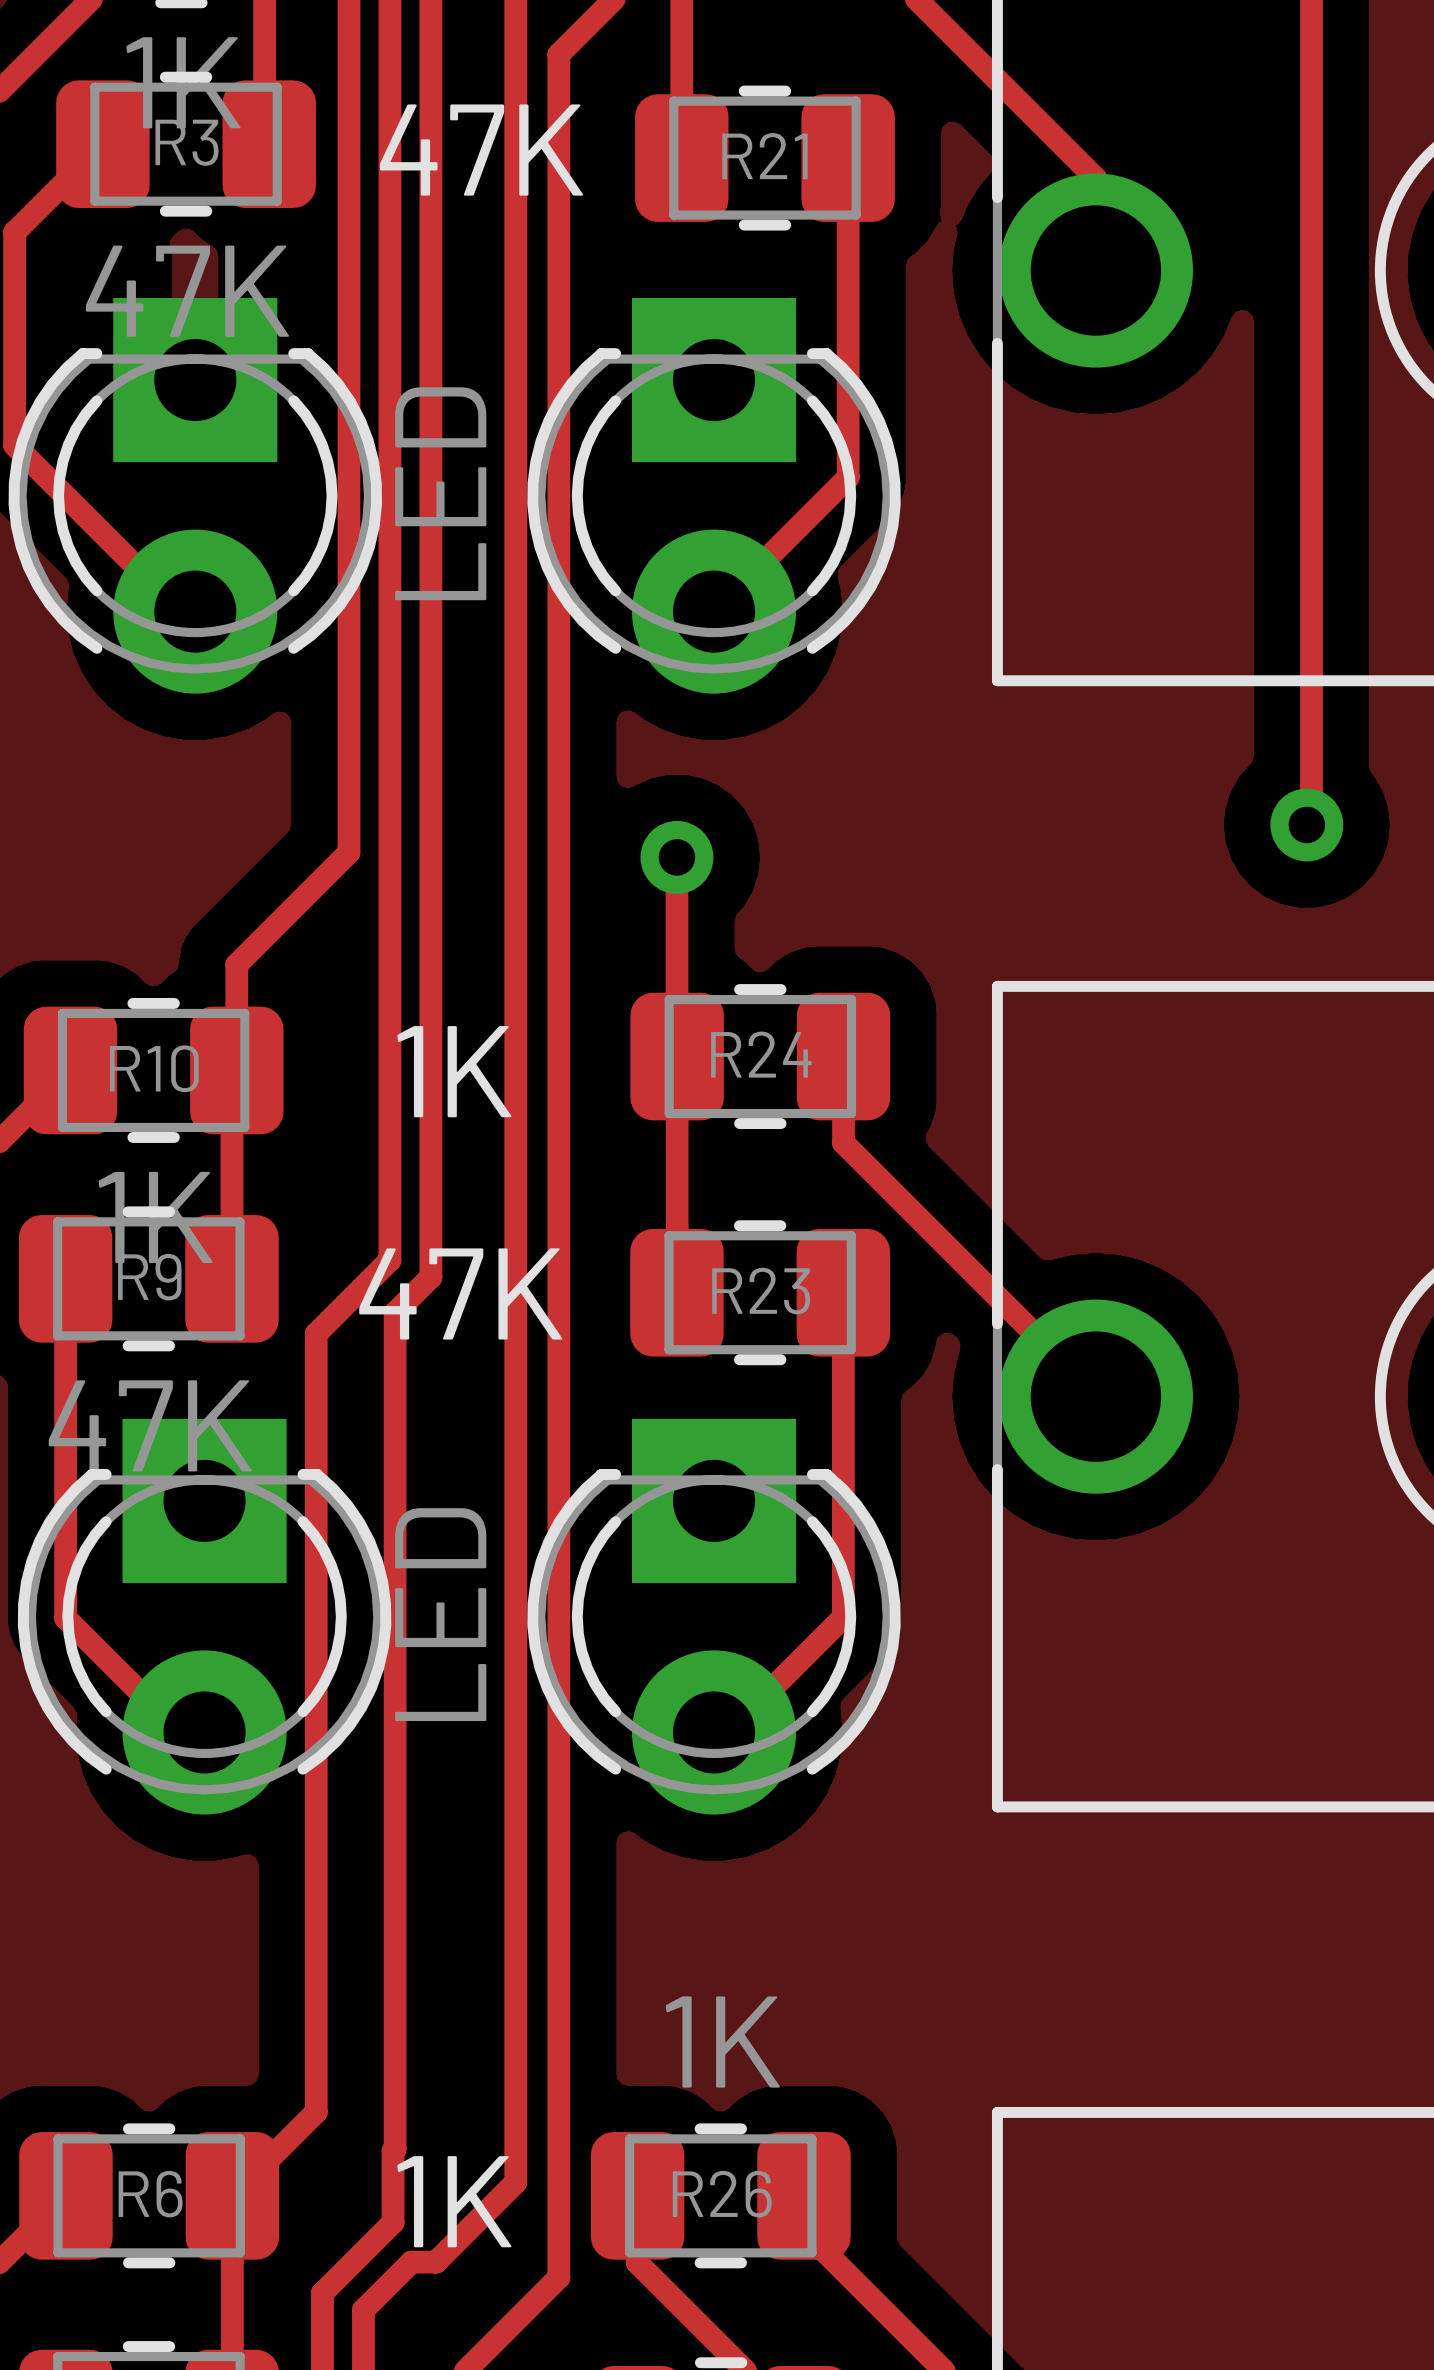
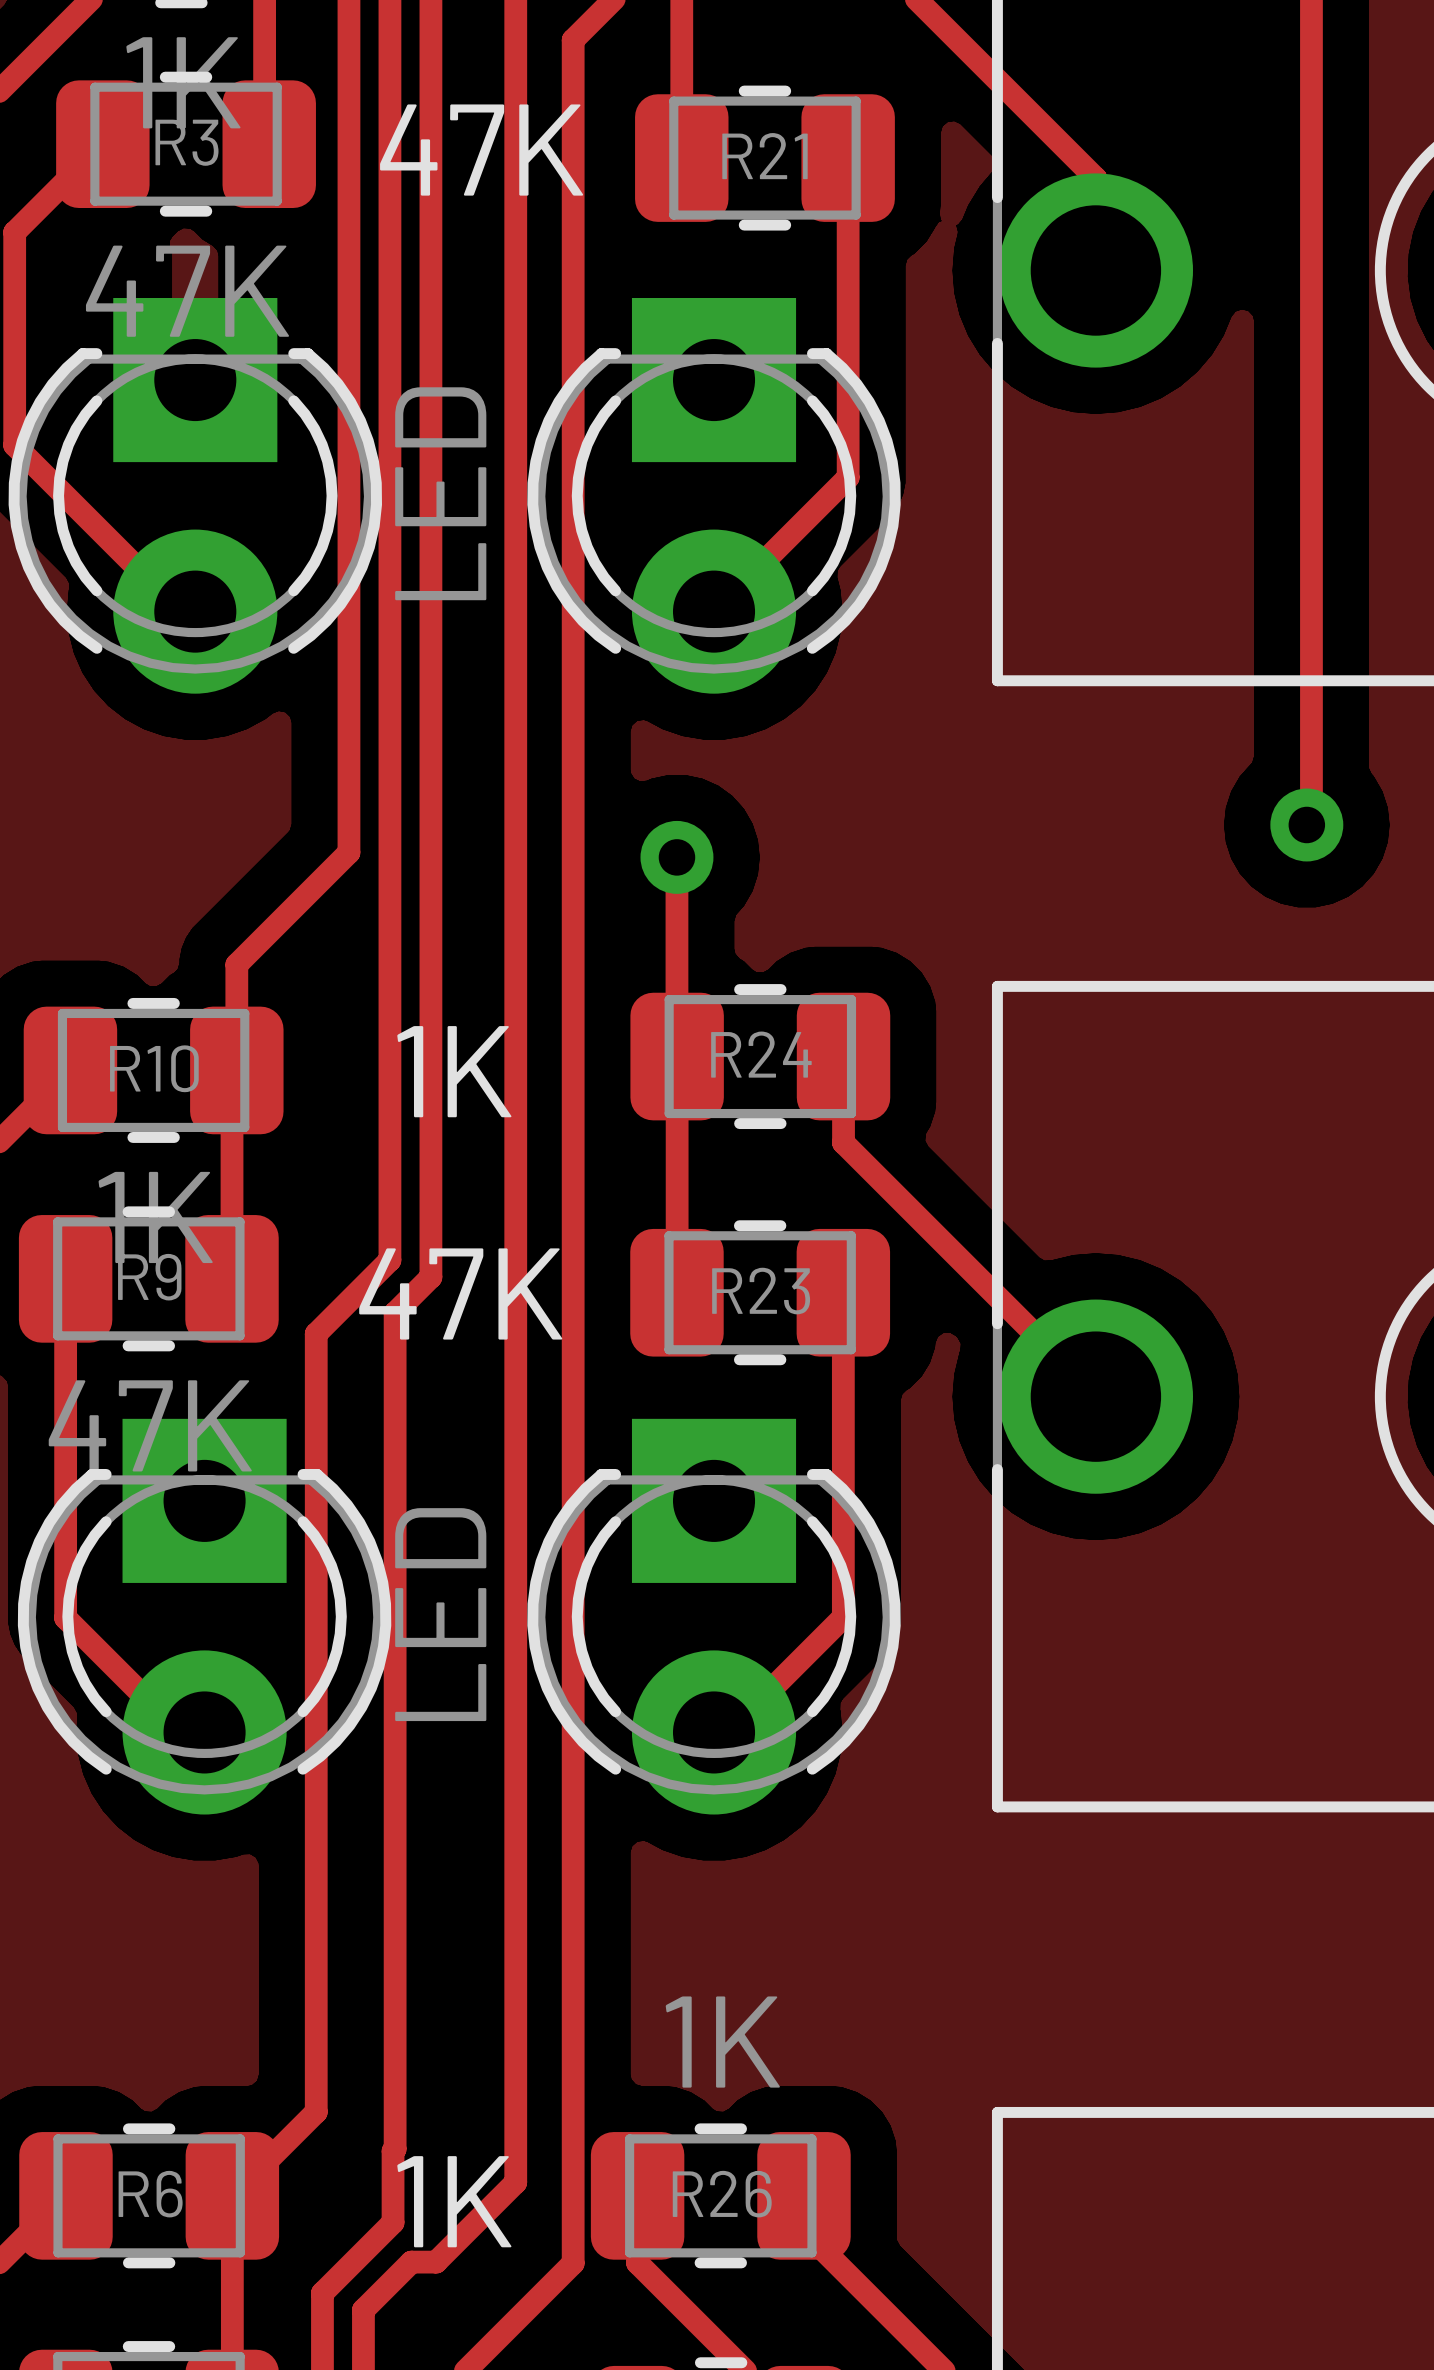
track: (573, 40) (558, 54) (558, 2277) -> (573, 40) (573, 2263) (558, 2277)

